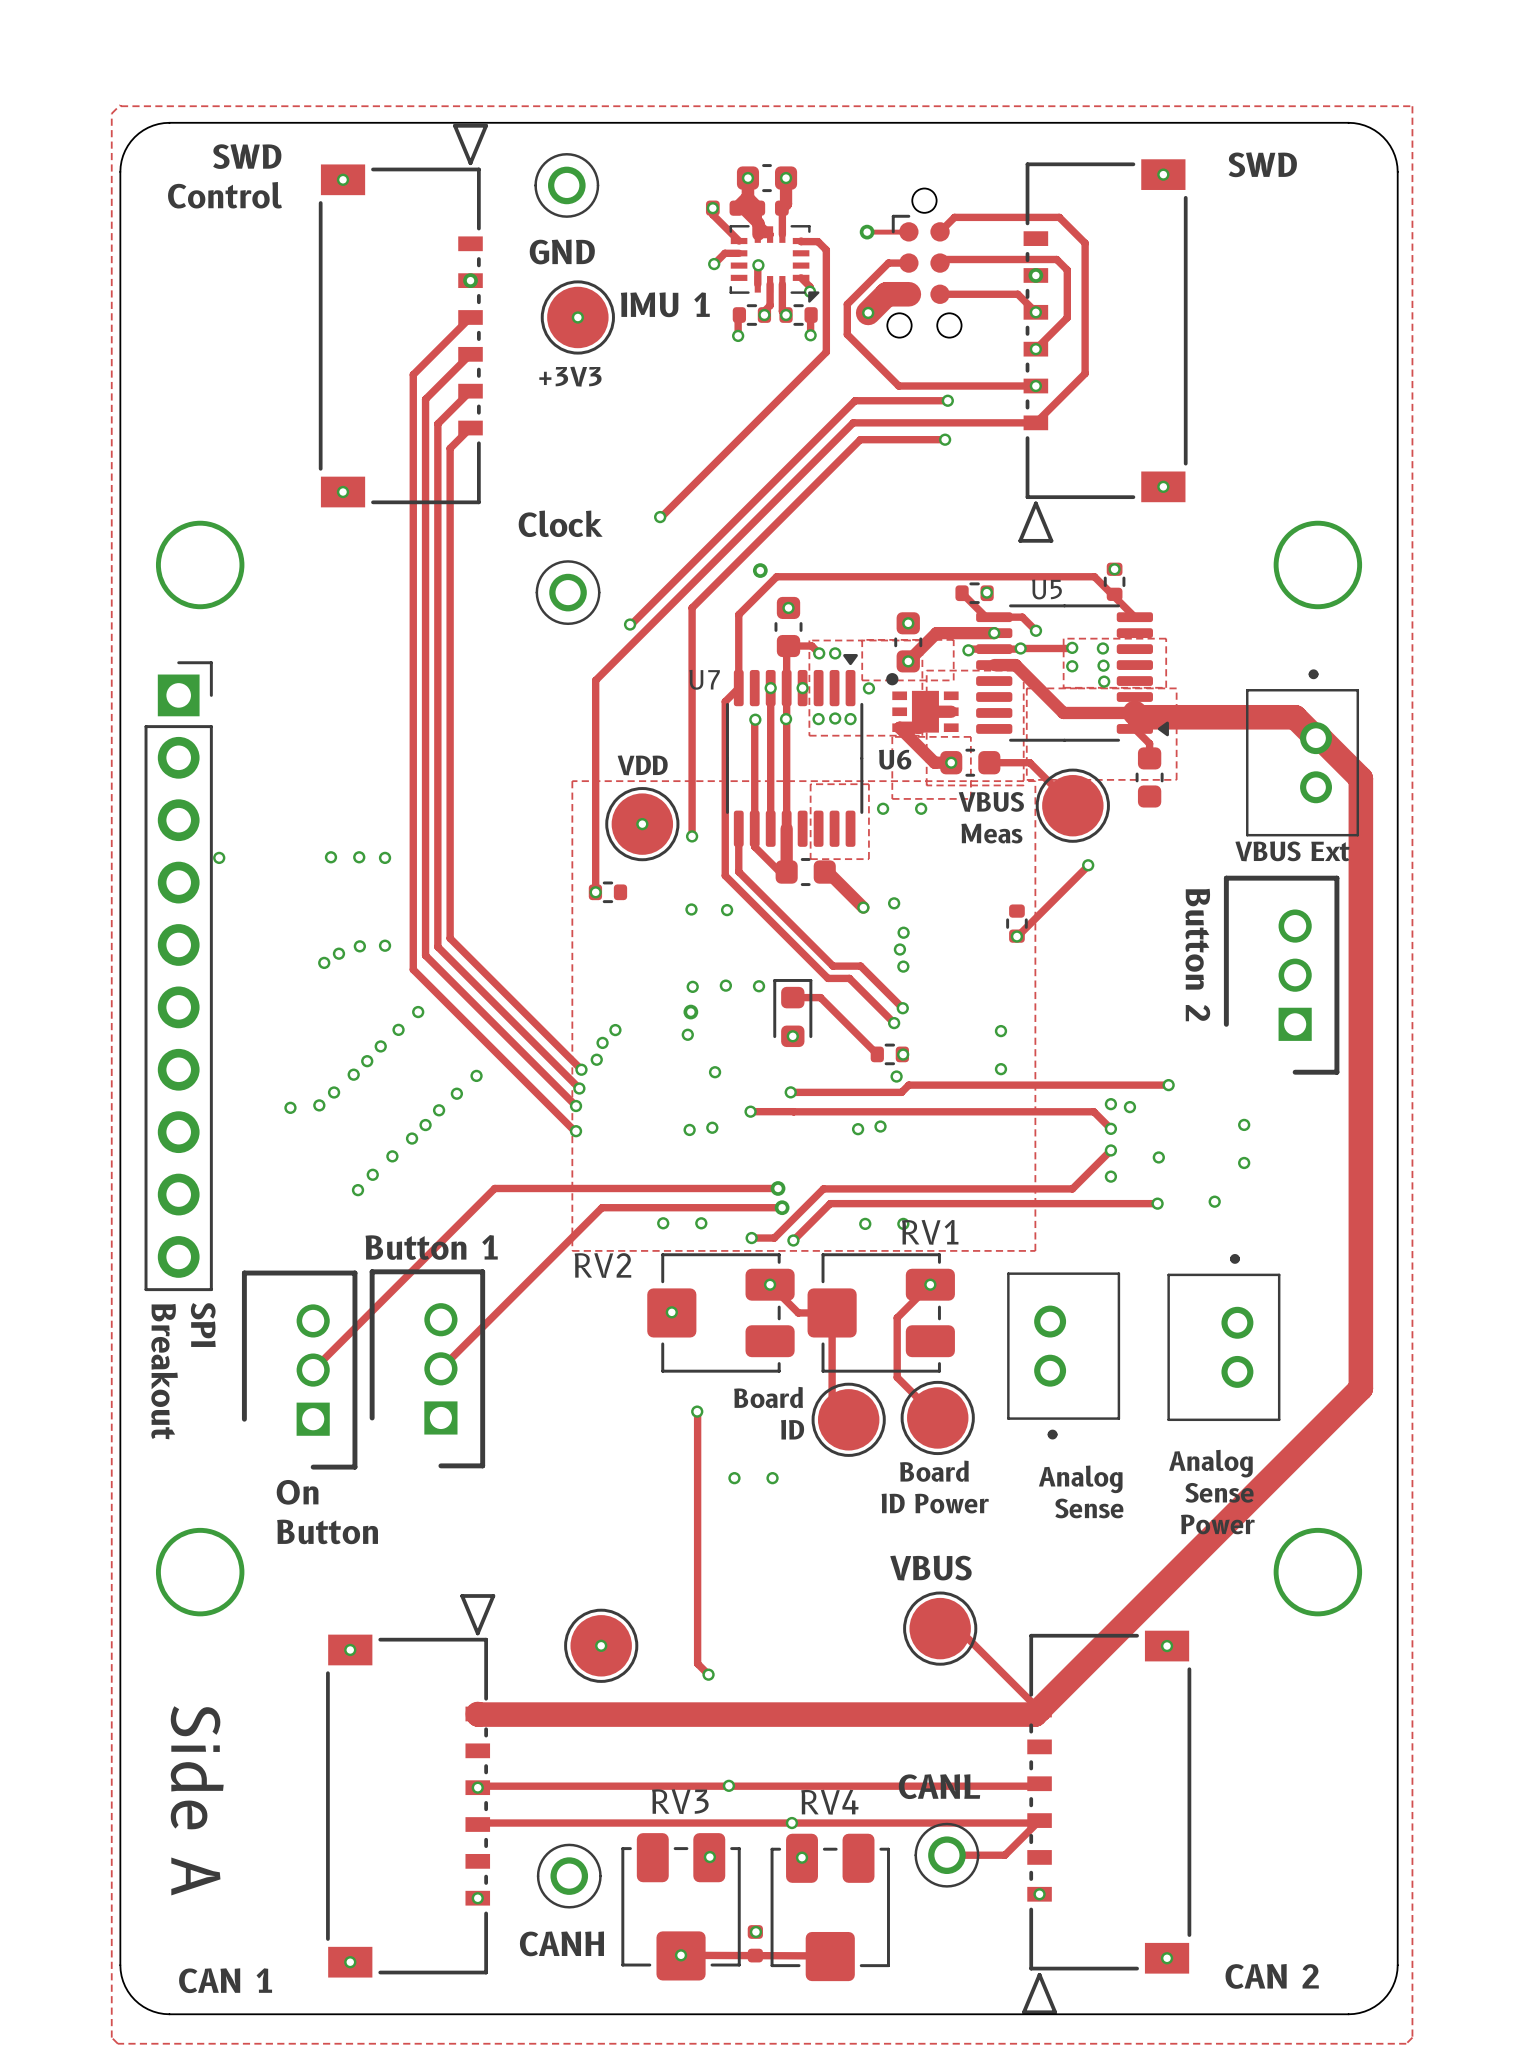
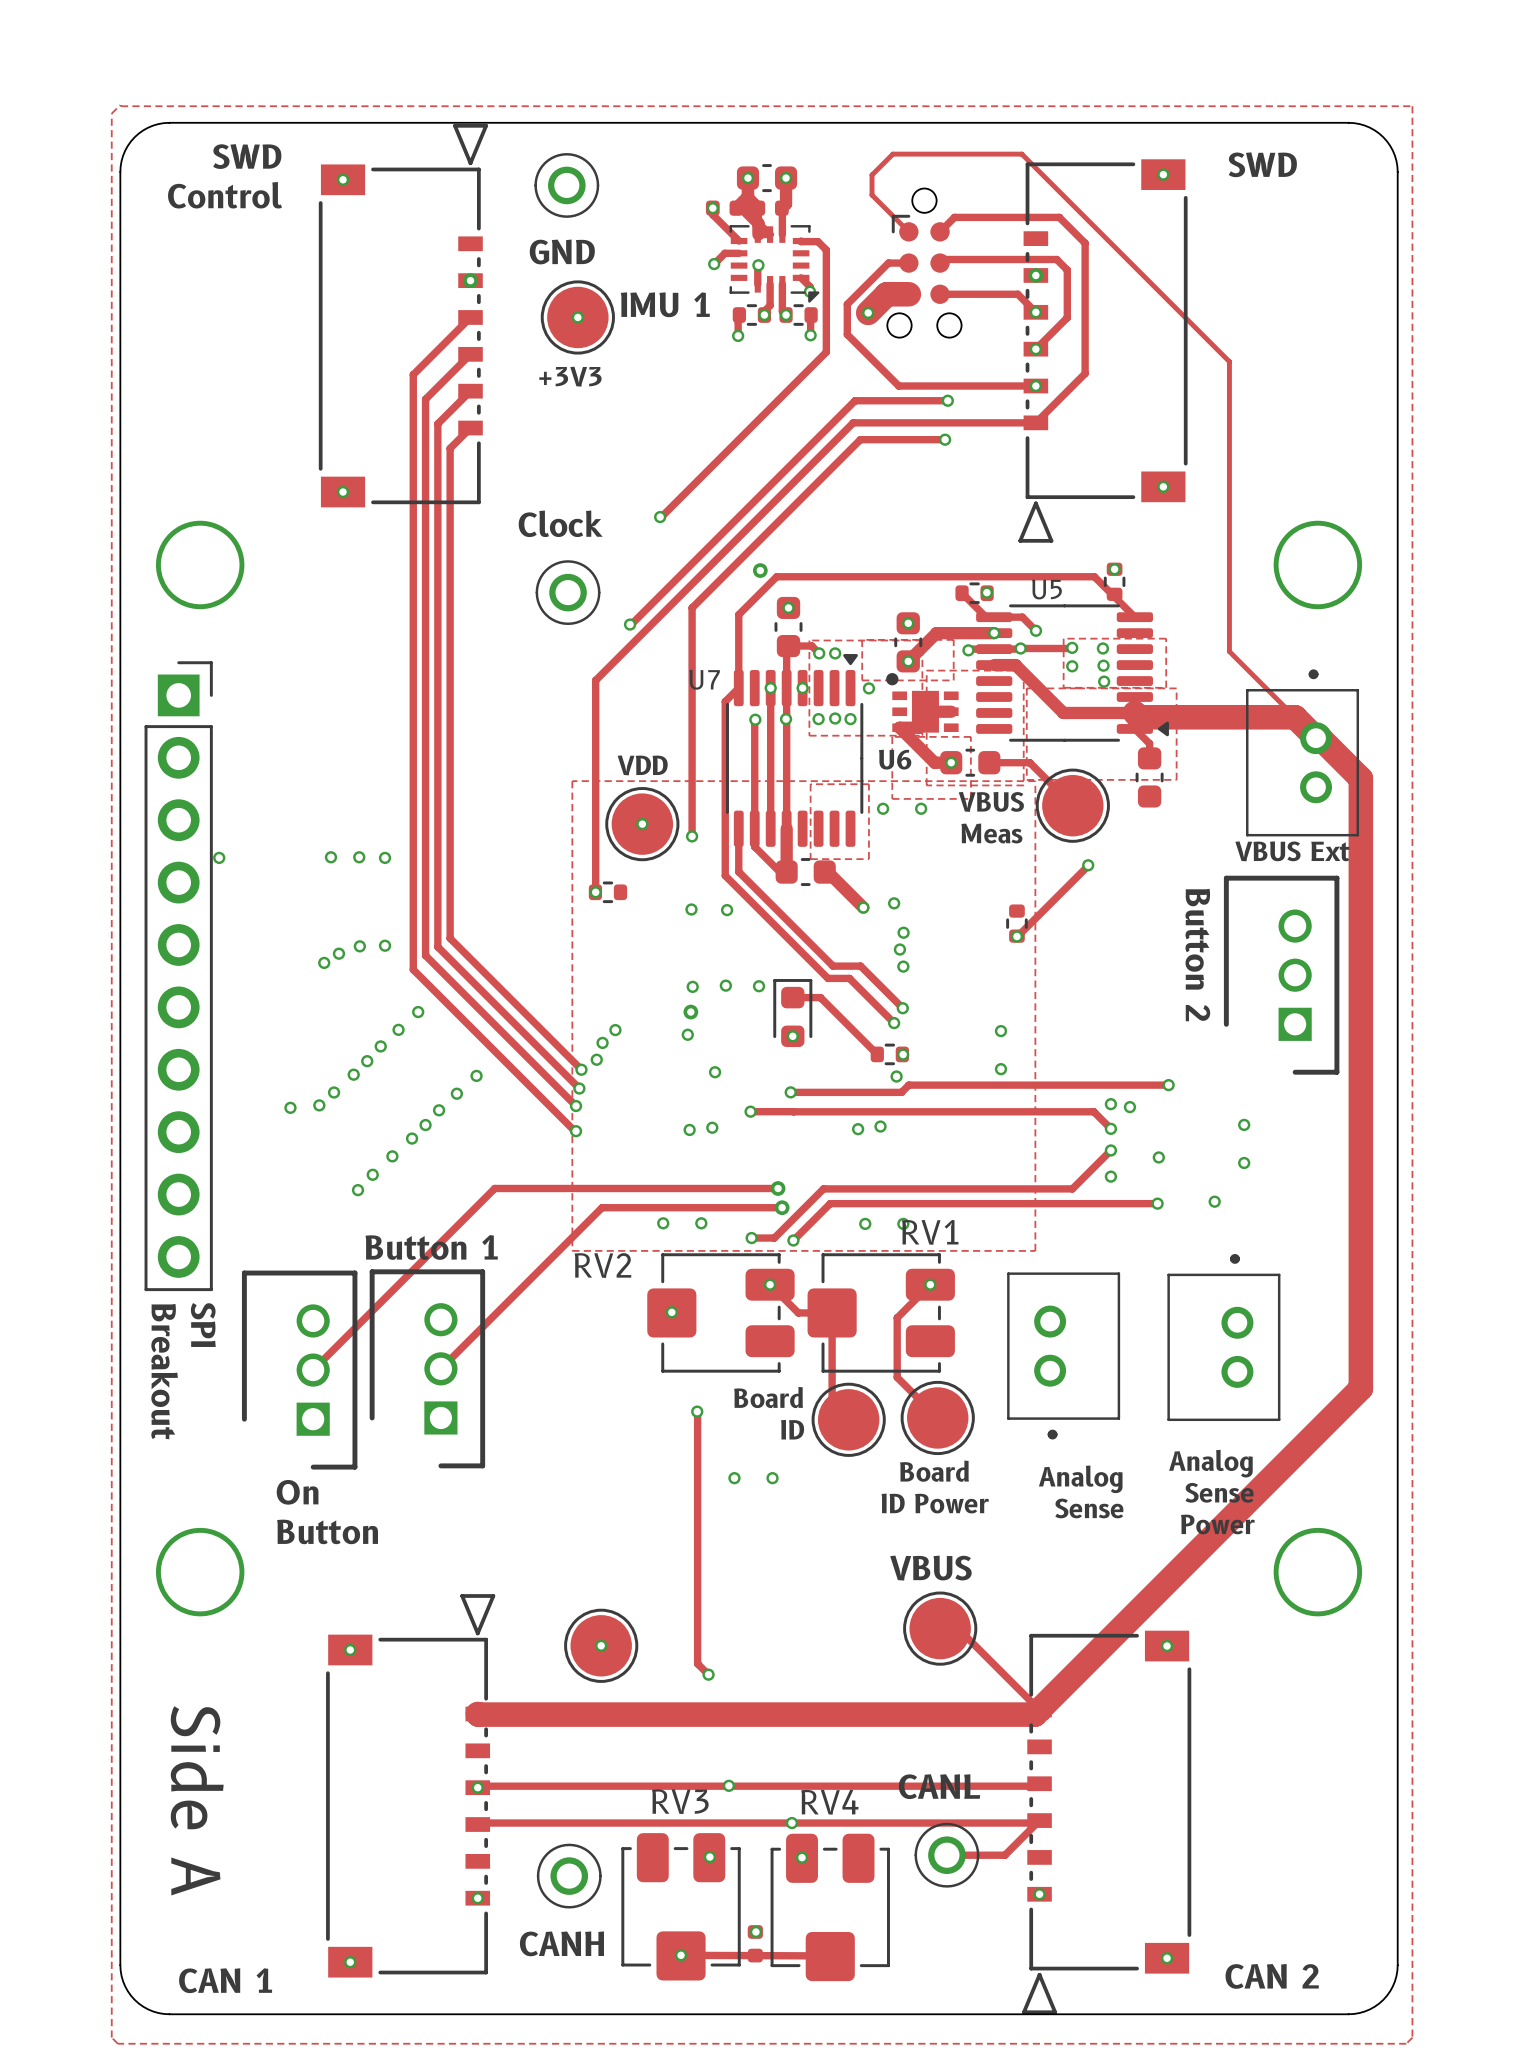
track: (867, 232) (908, 232) -> (1316, 738) (1229, 651) (1229, 361) (1021, 154) (892, 154) (872, 175) (872, 195) (908, 231)
via: (867, 232) -> none

